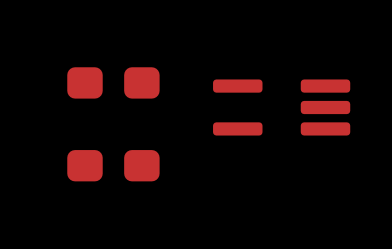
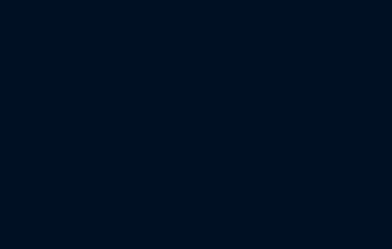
part: (113, 82) -> none
part: (281, 107) -> none
part: (113, 165) -> none

